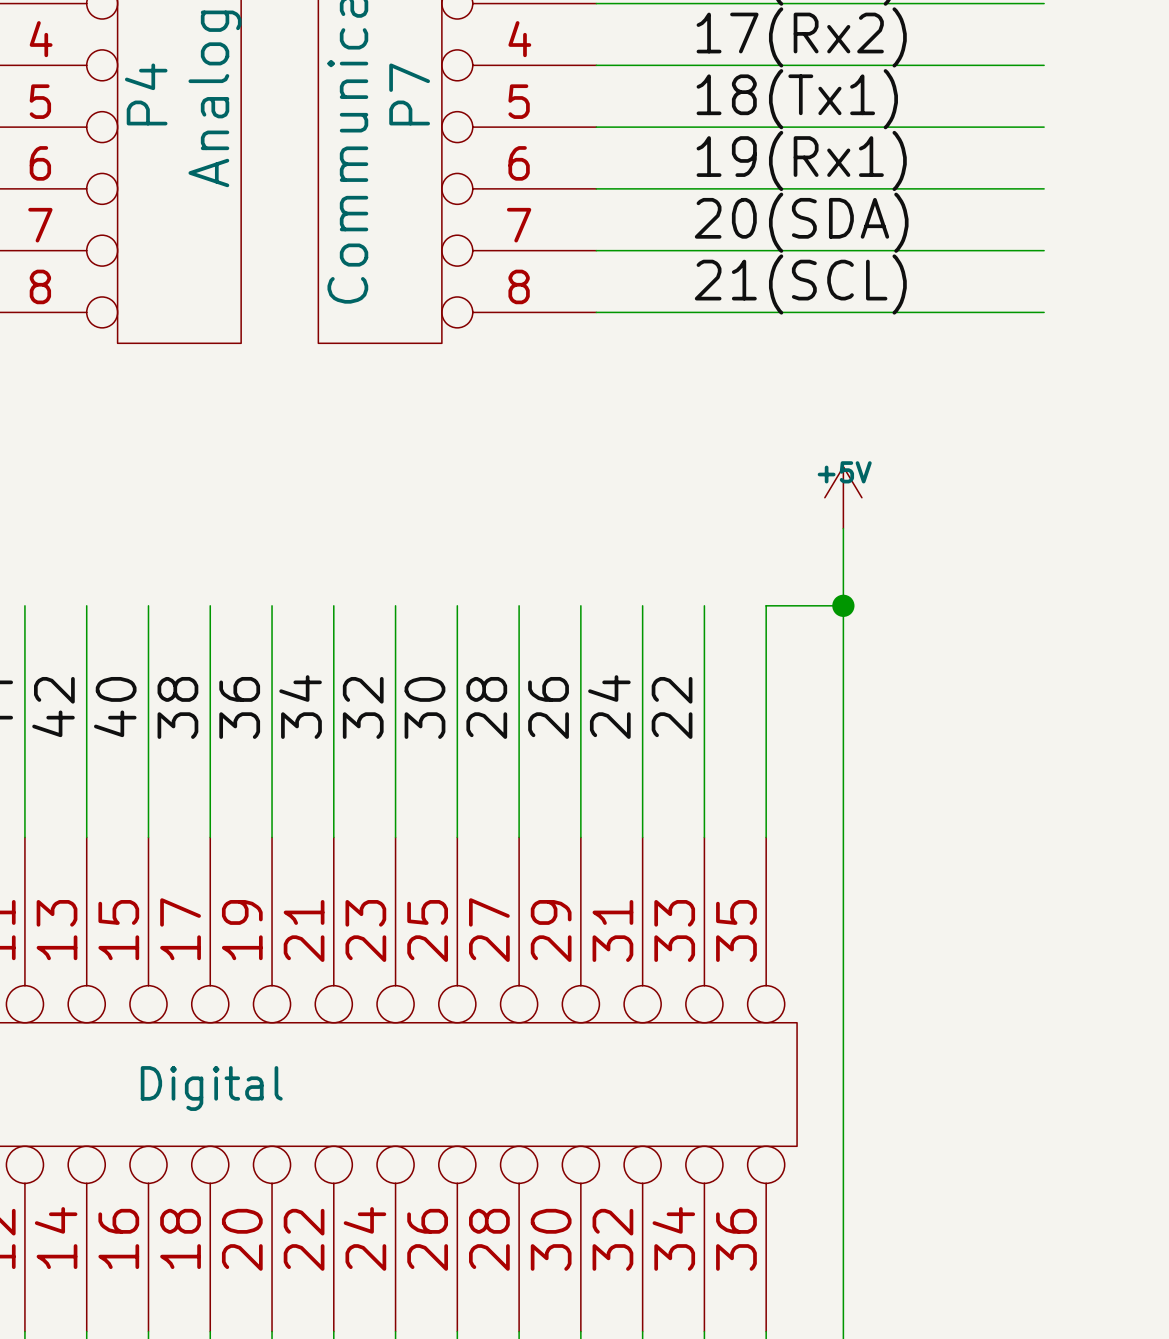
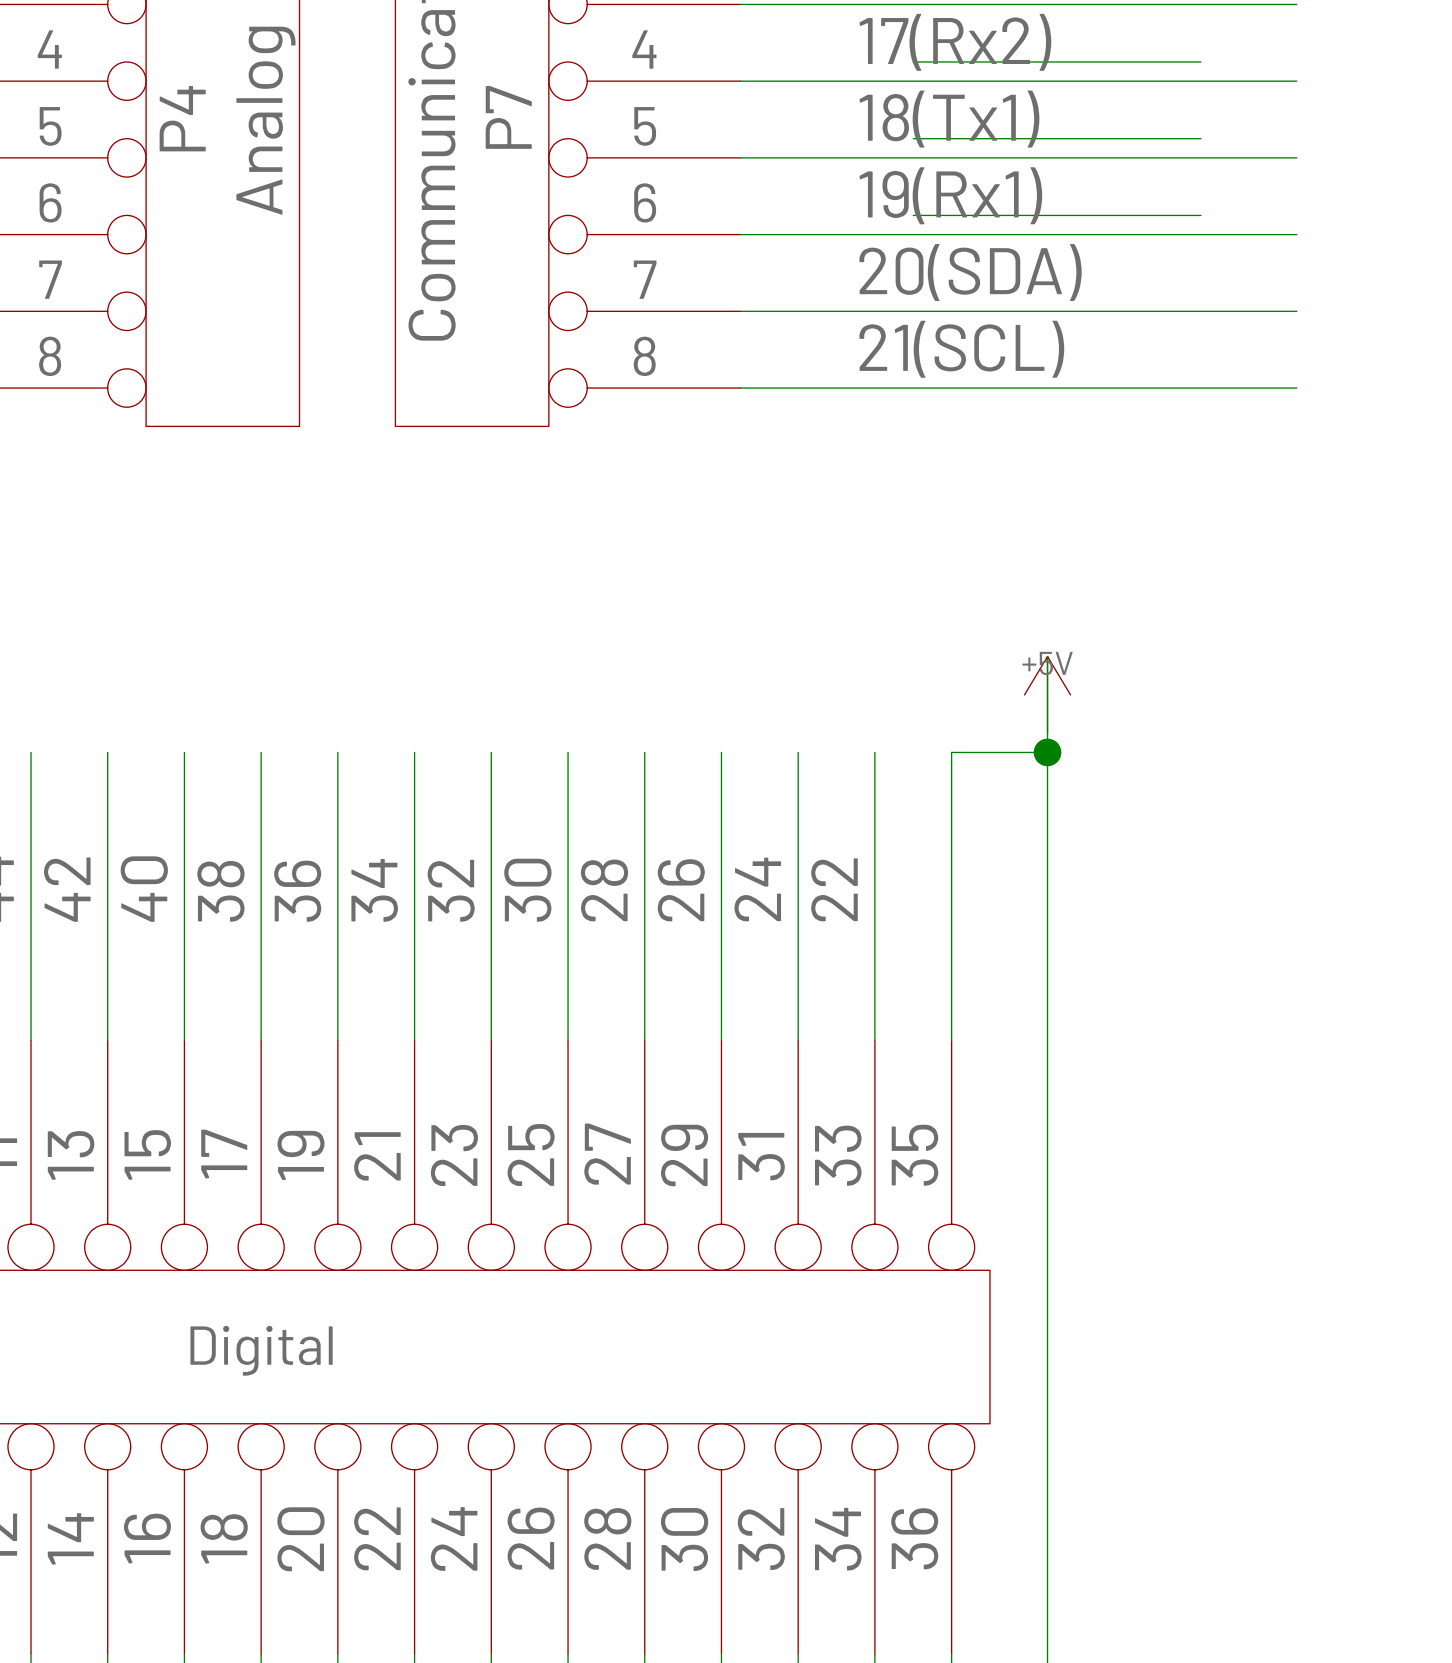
wire: none -> (913, 61) (1200, 61)
wire: none -> (913, 138) (1200, 138)
wire: none -> (913, 215) (1200, 215)
power symbol position: +5V (843, 497) -> +5V (1047, 694)

